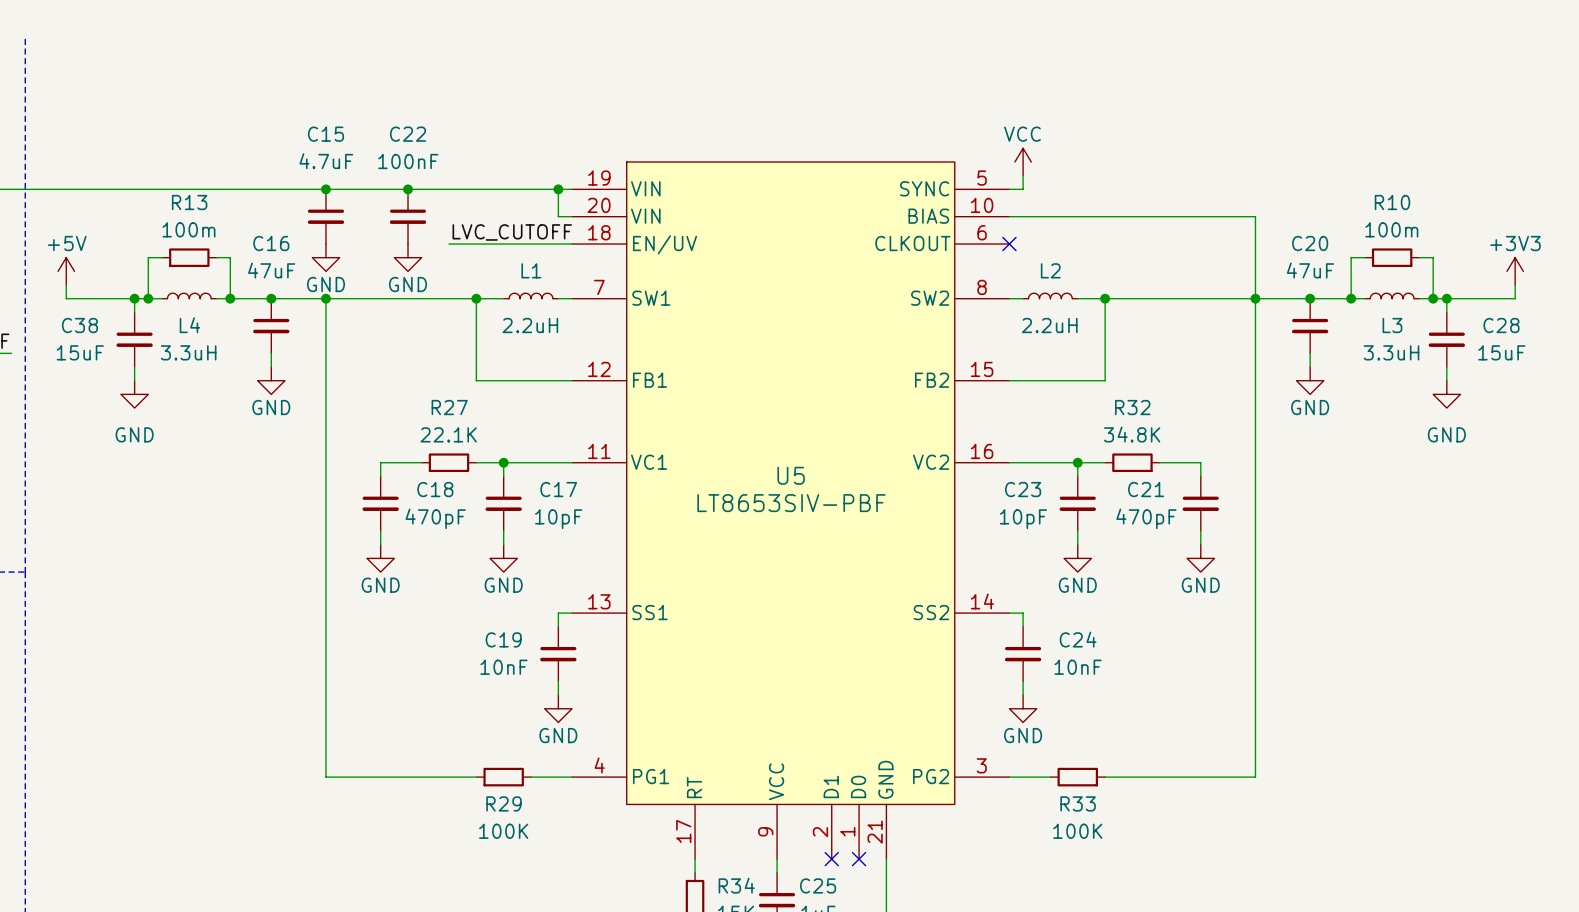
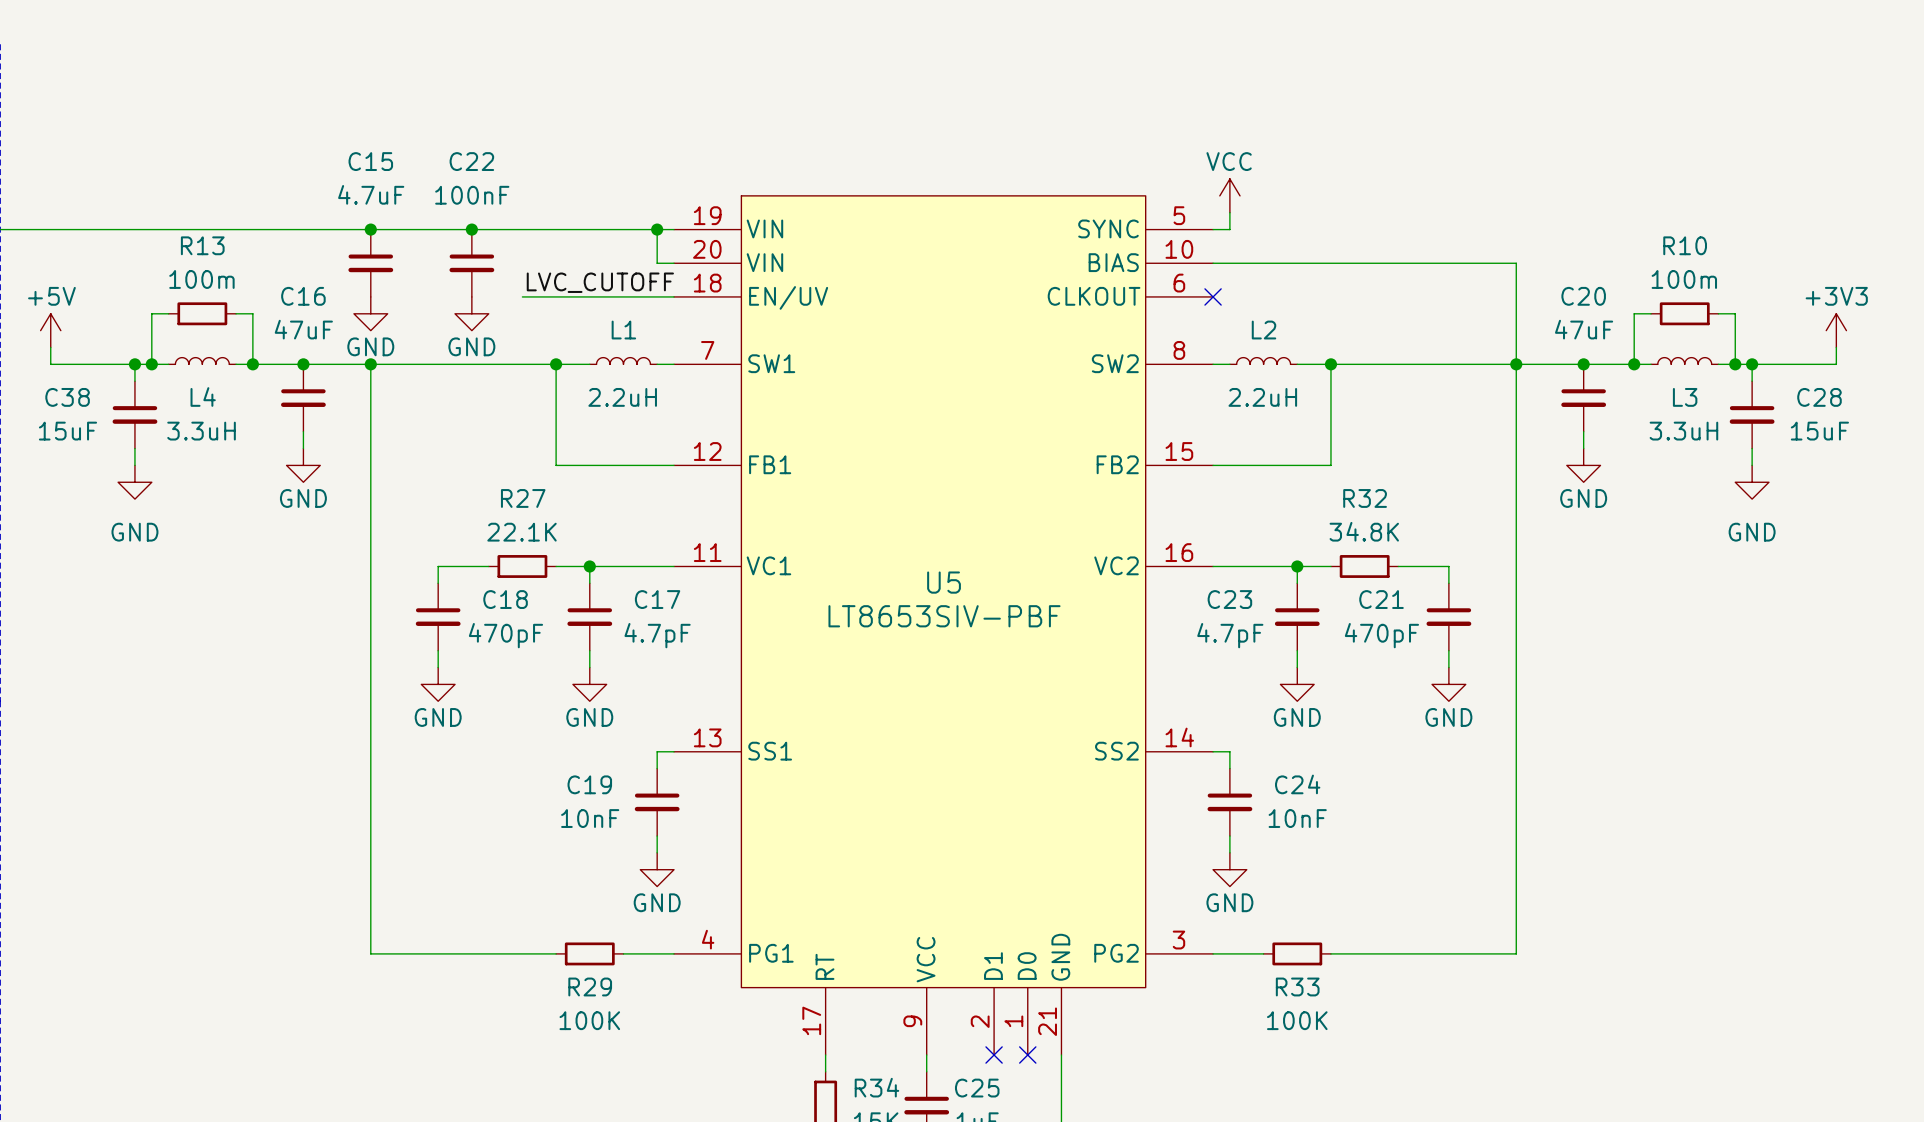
C17 value: 10pF (558, 519) -> 4.7pF (657, 635)
C23 value: 10pF (1023, 519) -> 4.7pF (1230, 635)

